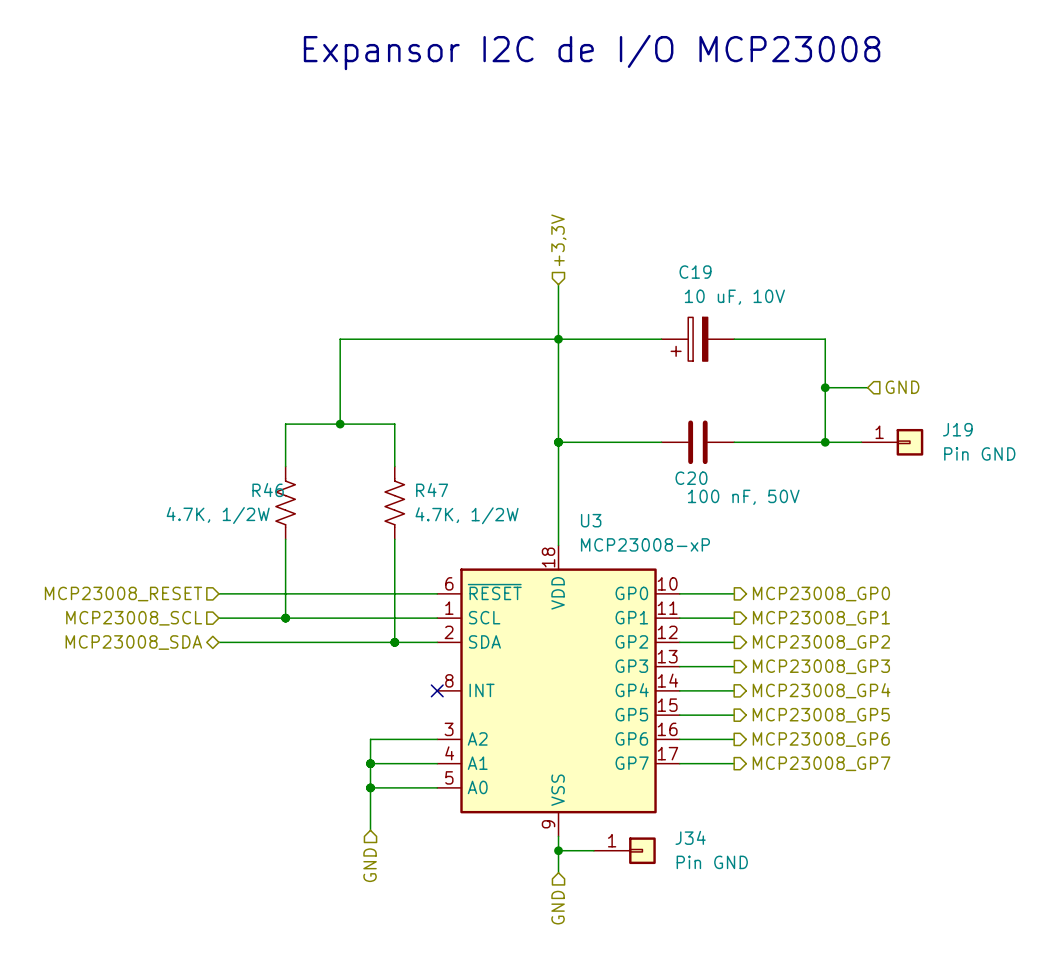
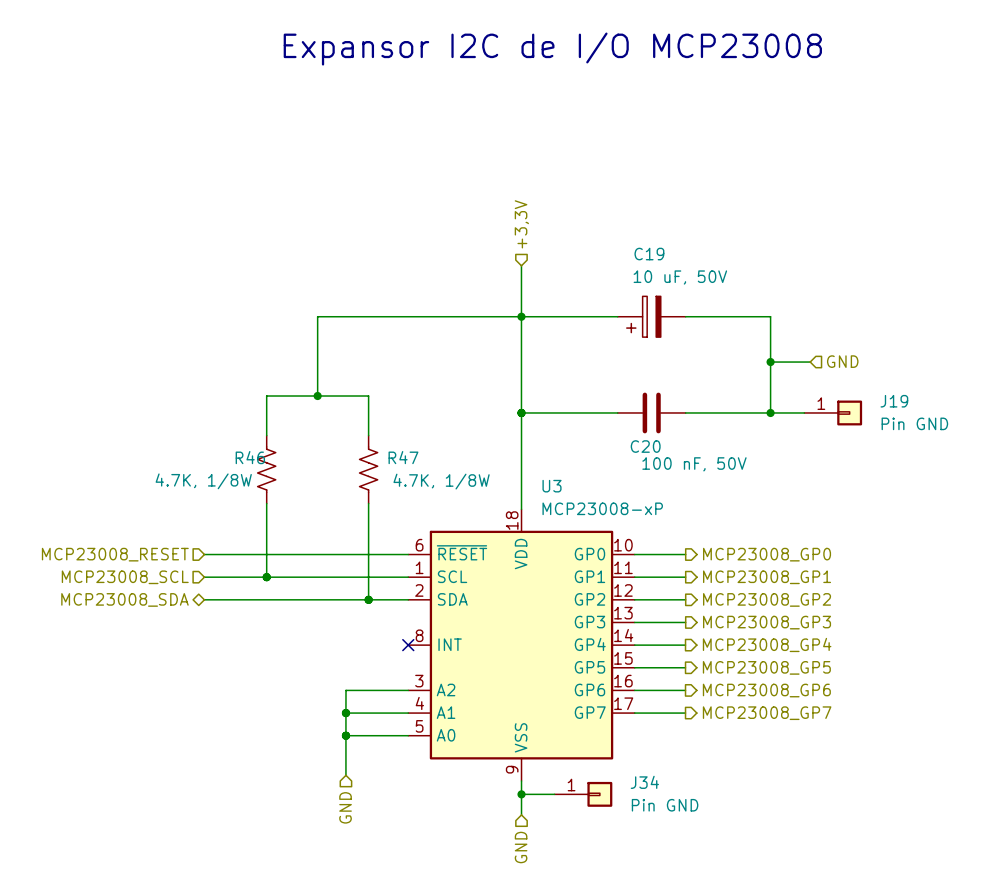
C19 value: 10 uF, 10V (734, 297) -> 10 uF, 50V (680, 277)
R46 value: 4.7K, 1/2W (218, 515) -> 4.7K, 1/8W (203, 481)
R47 value: 4.7K, 1/2W (467, 515) -> 4.7K, 1/8W (441, 481)

